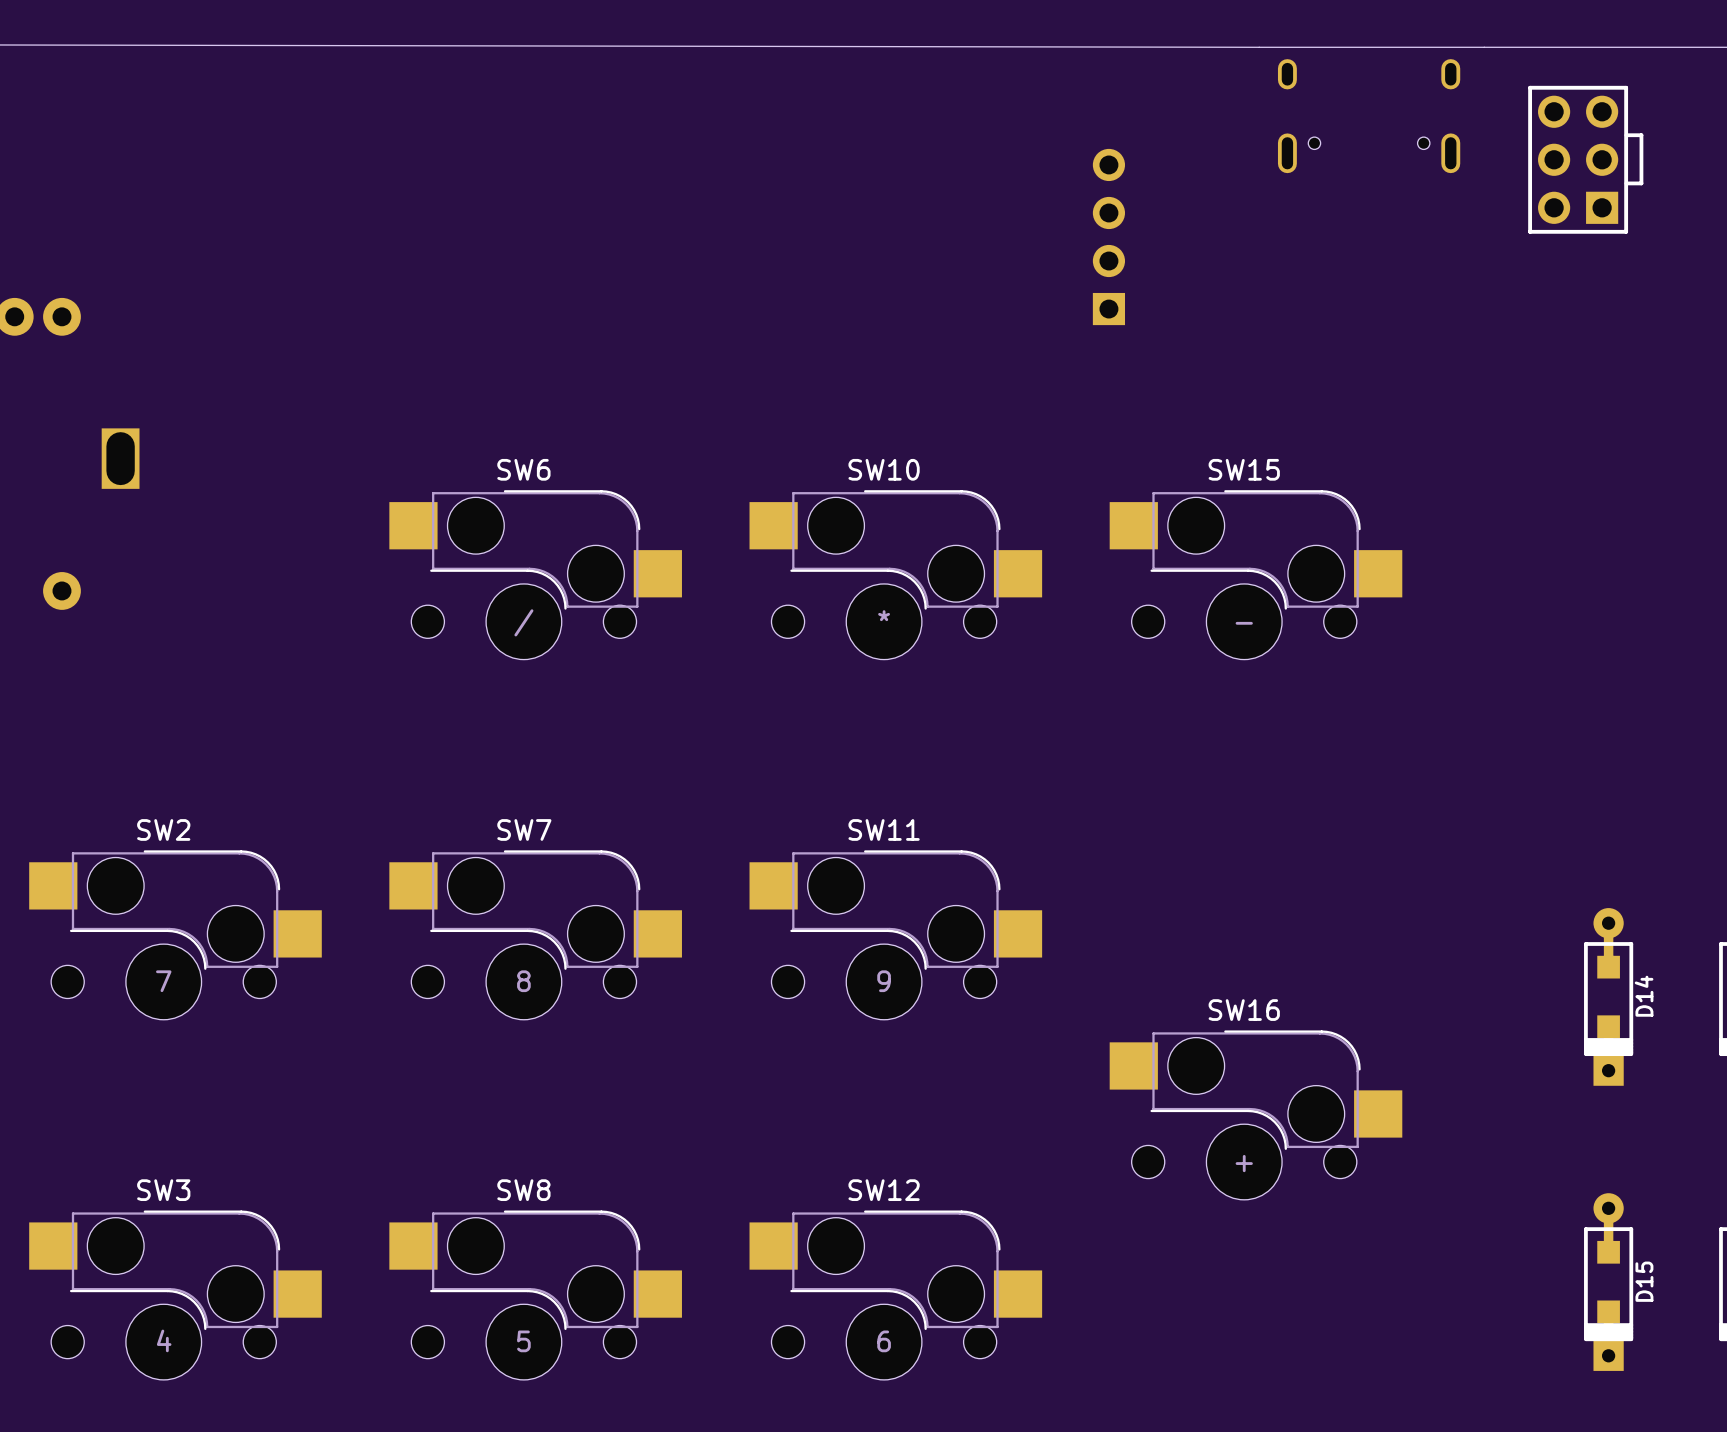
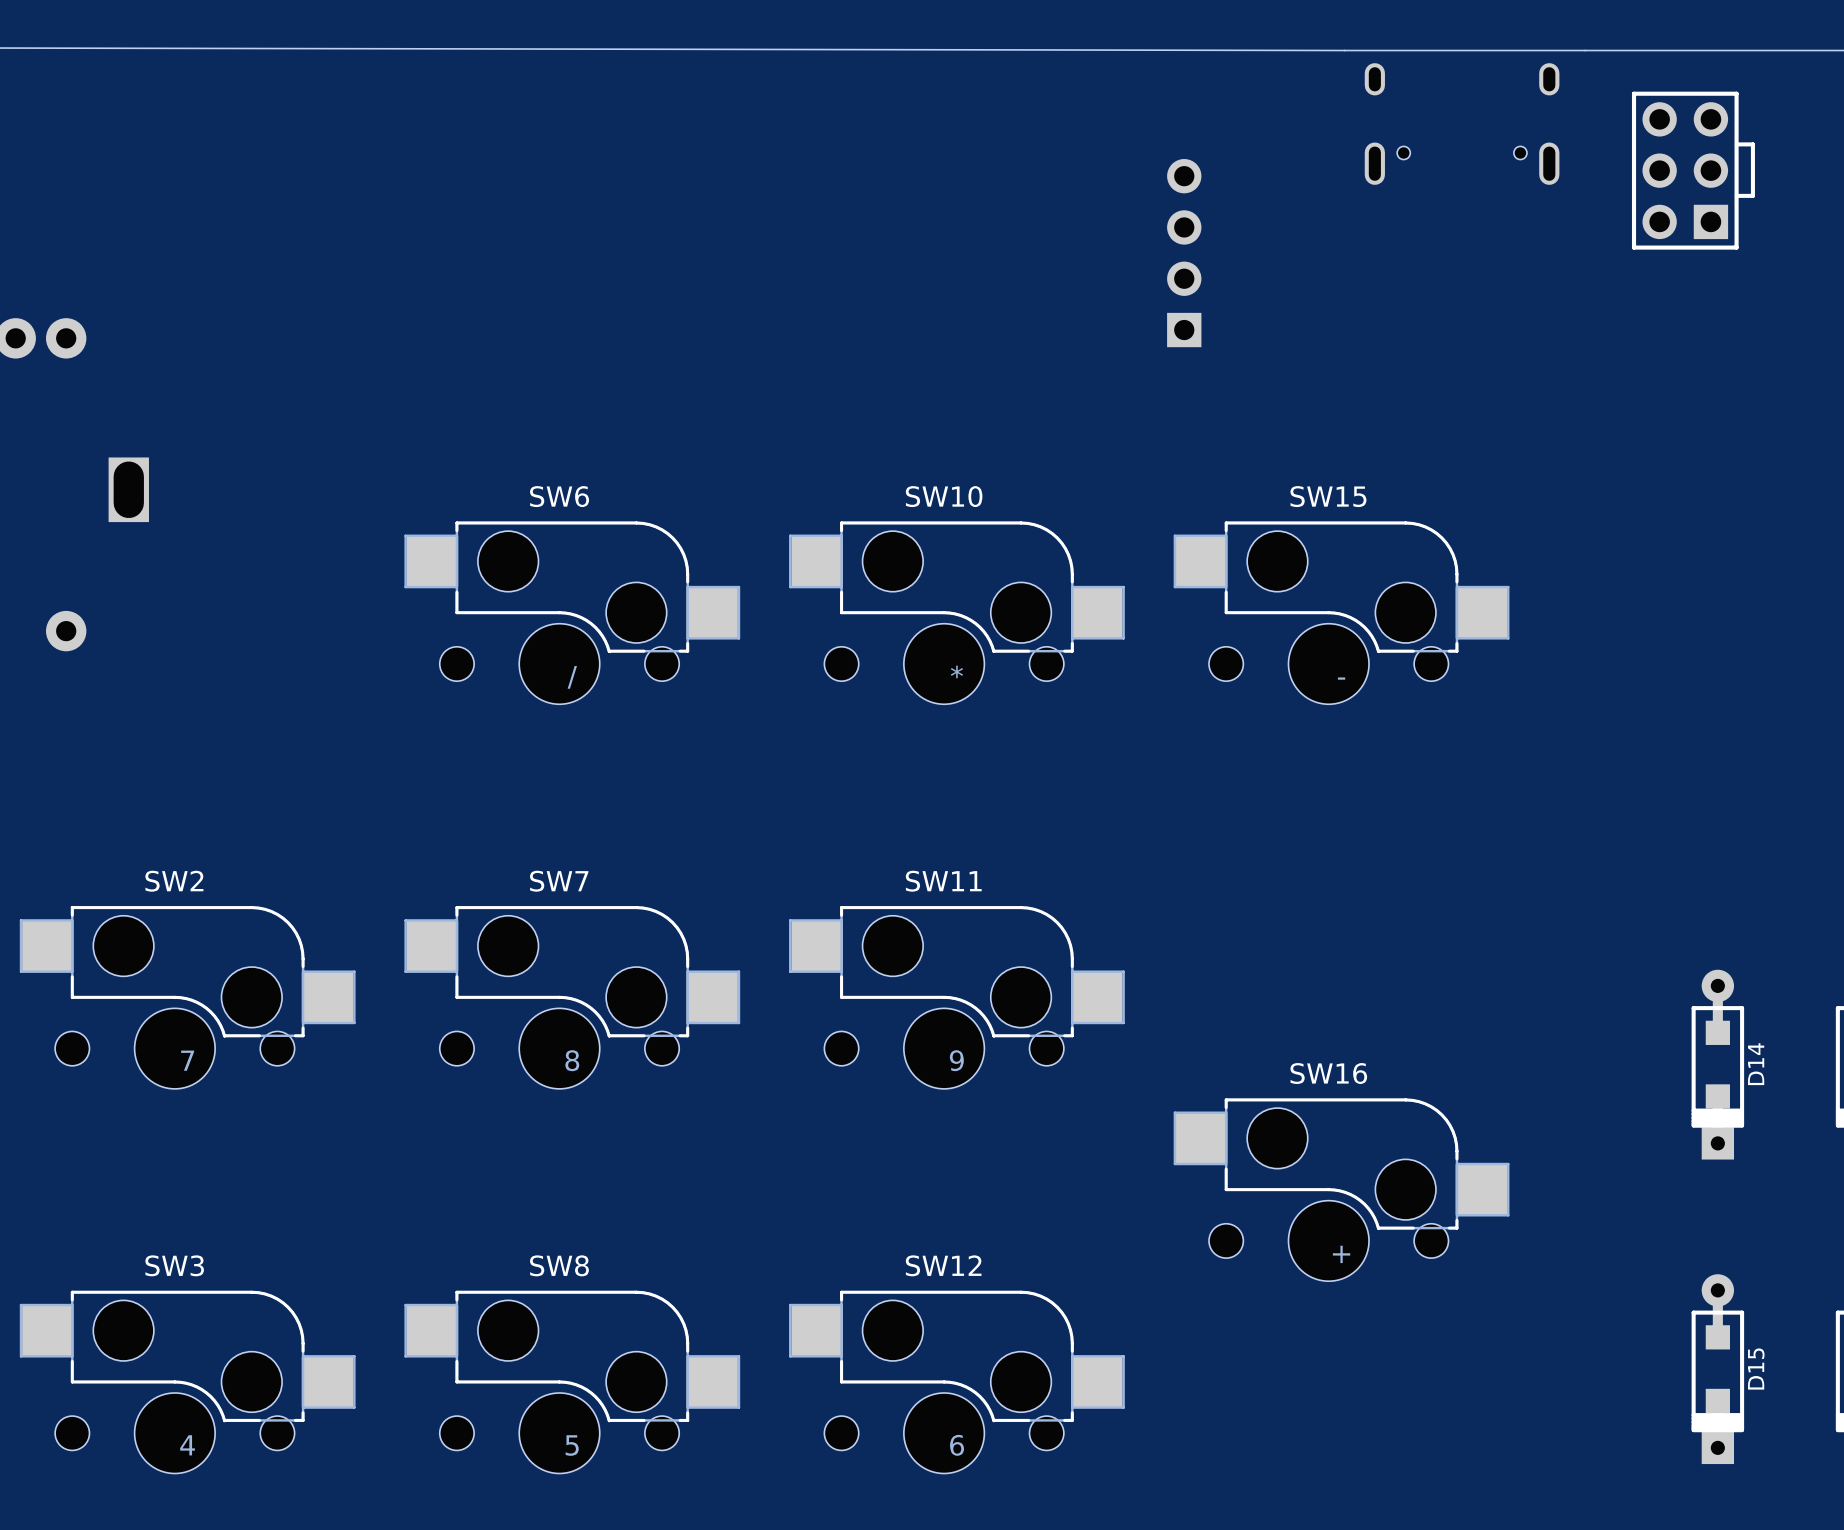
SW6 footprint: [389, 490, 682, 660] -> [404, 521, 741, 705]
SW10 footprint: [749, 490, 1043, 660] -> [789, 521, 1125, 705]
SW15 footprint: [1109, 490, 1403, 660] -> [1173, 521, 1510, 705]
SW2 footprint: [29, 850, 322, 1020] -> [19, 906, 356, 1089]
SW7 footprint: [389, 850, 682, 1020] -> [404, 906, 741, 1089]
SW11 footprint: [749, 850, 1043, 1020] -> [789, 906, 1125, 1089]
SW16 footprint: [1109, 1030, 1403, 1200] -> [1173, 1098, 1510, 1282]
SW3 footprint: [29, 1210, 322, 1380] -> [19, 1290, 356, 1474]
SW8 footprint: [389, 1210, 682, 1380] -> [404, 1290, 741, 1474]
SW12 footprint: [749, 1210, 1043, 1380] -> [789, 1290, 1125, 1474]

